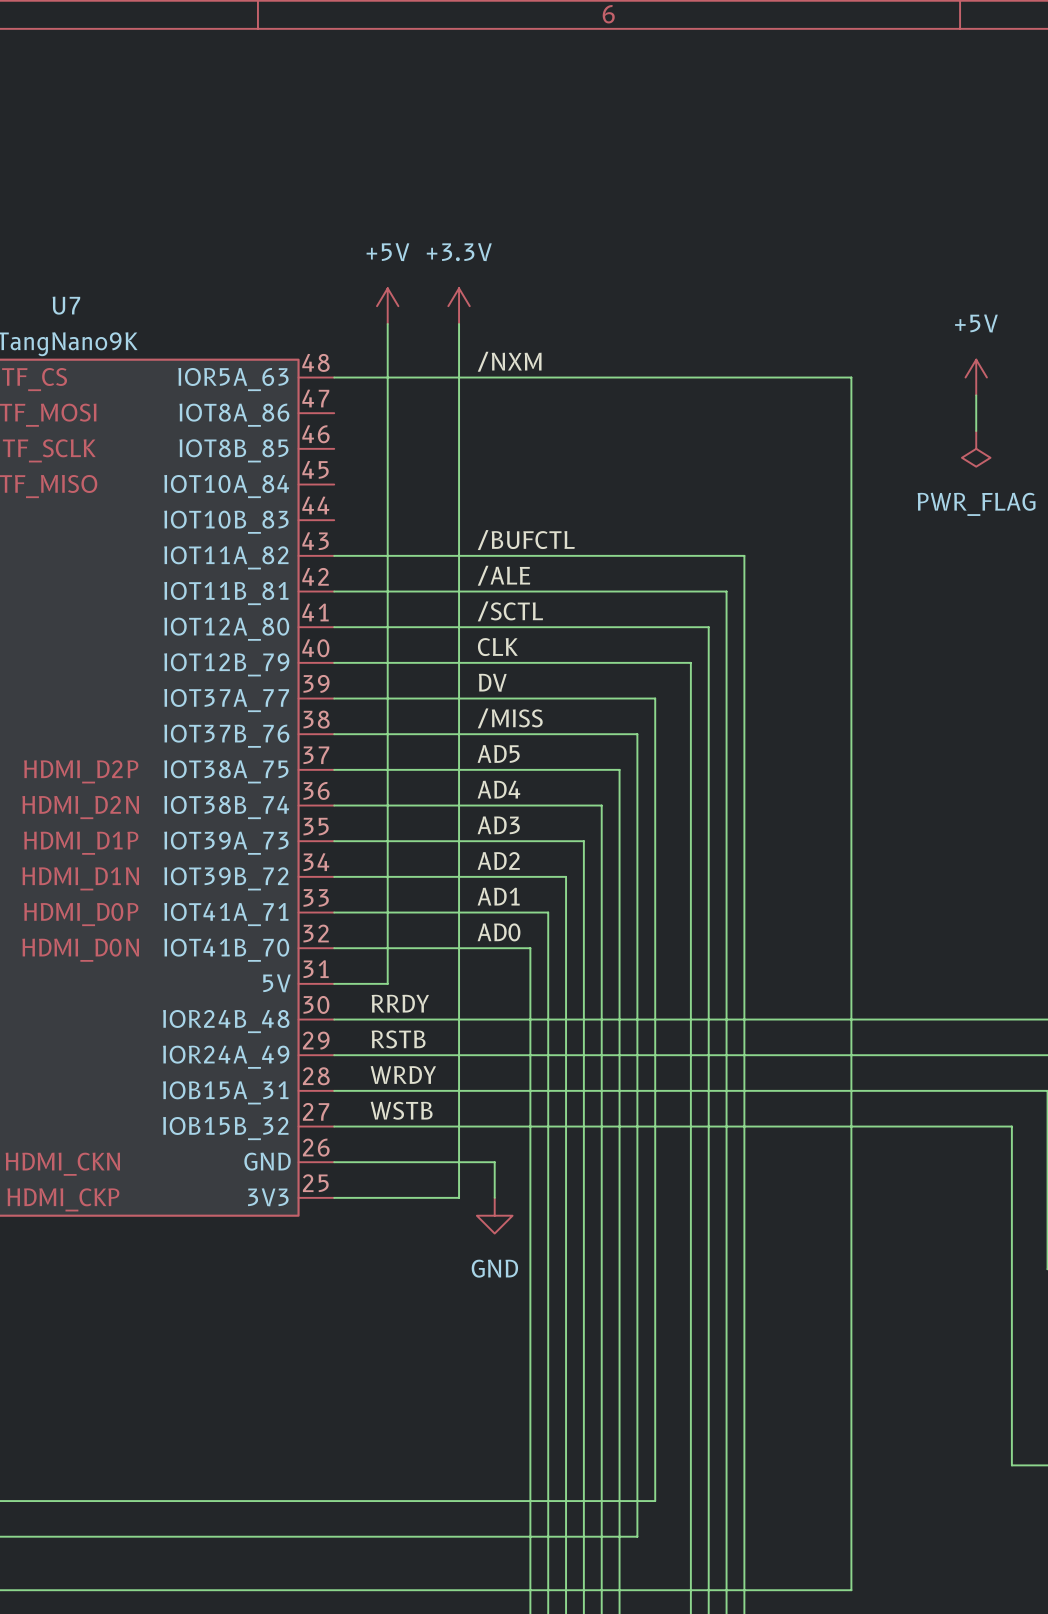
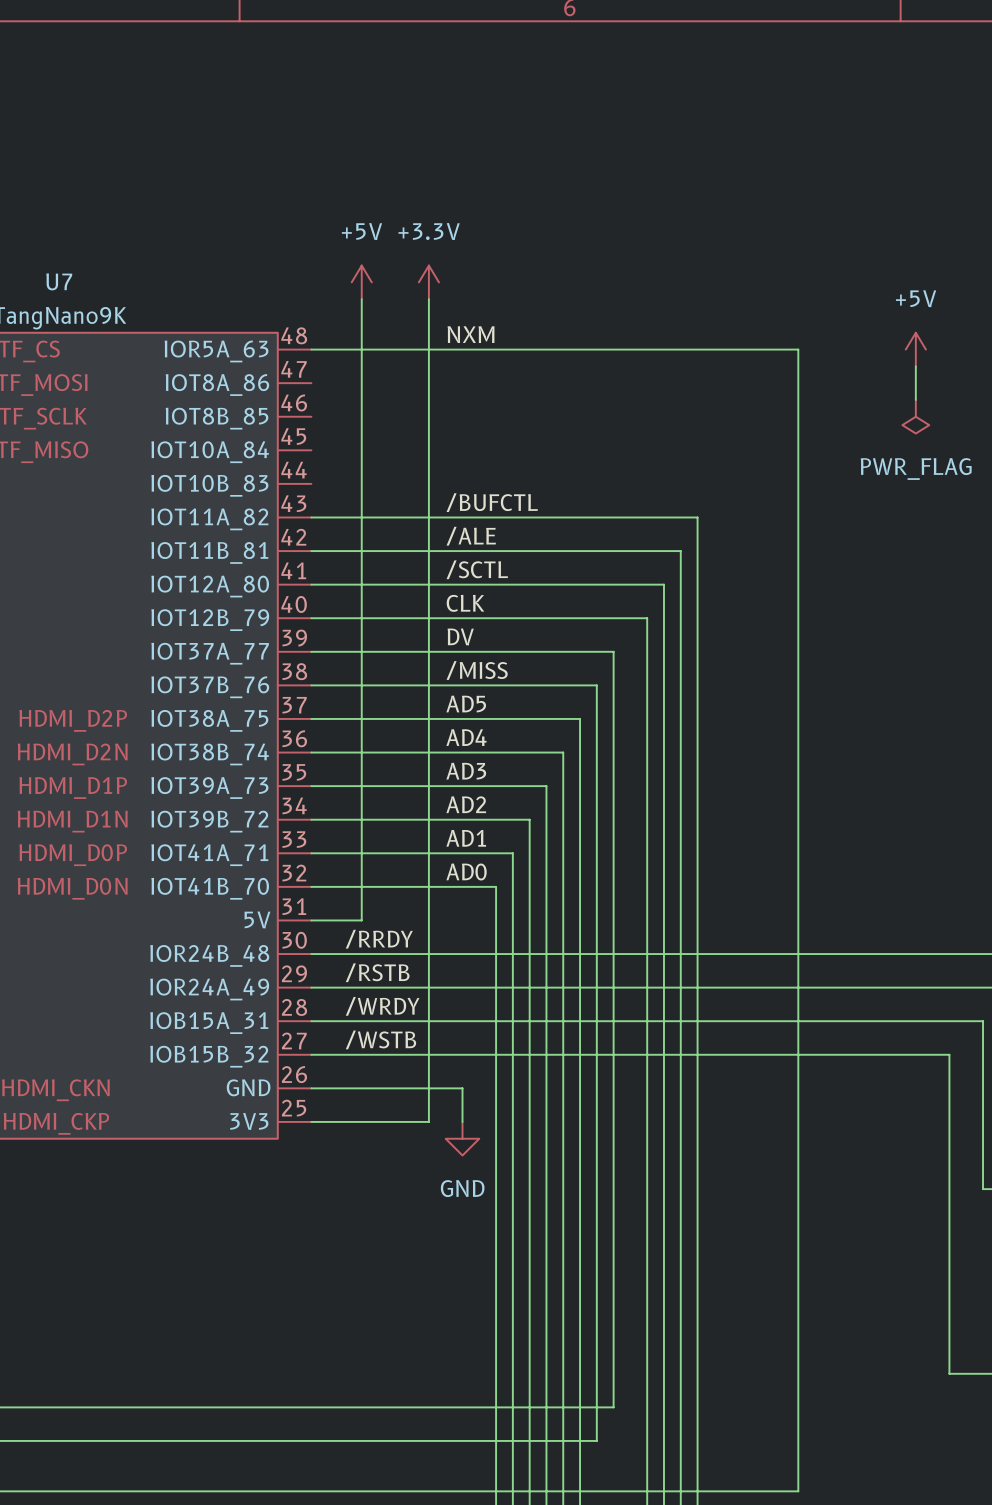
label: /NXM (509, 361) -> NXM (471, 334)
label: RRDY (400, 1003) -> /RRDY (379, 939)
label: RSTB (398, 1039) -> /RSTB (377, 972)
label: WRDY (403, 1074) -> /WRDY (382, 1006)
label: WSTB (401, 1110) -> /WSTB (380, 1039)

